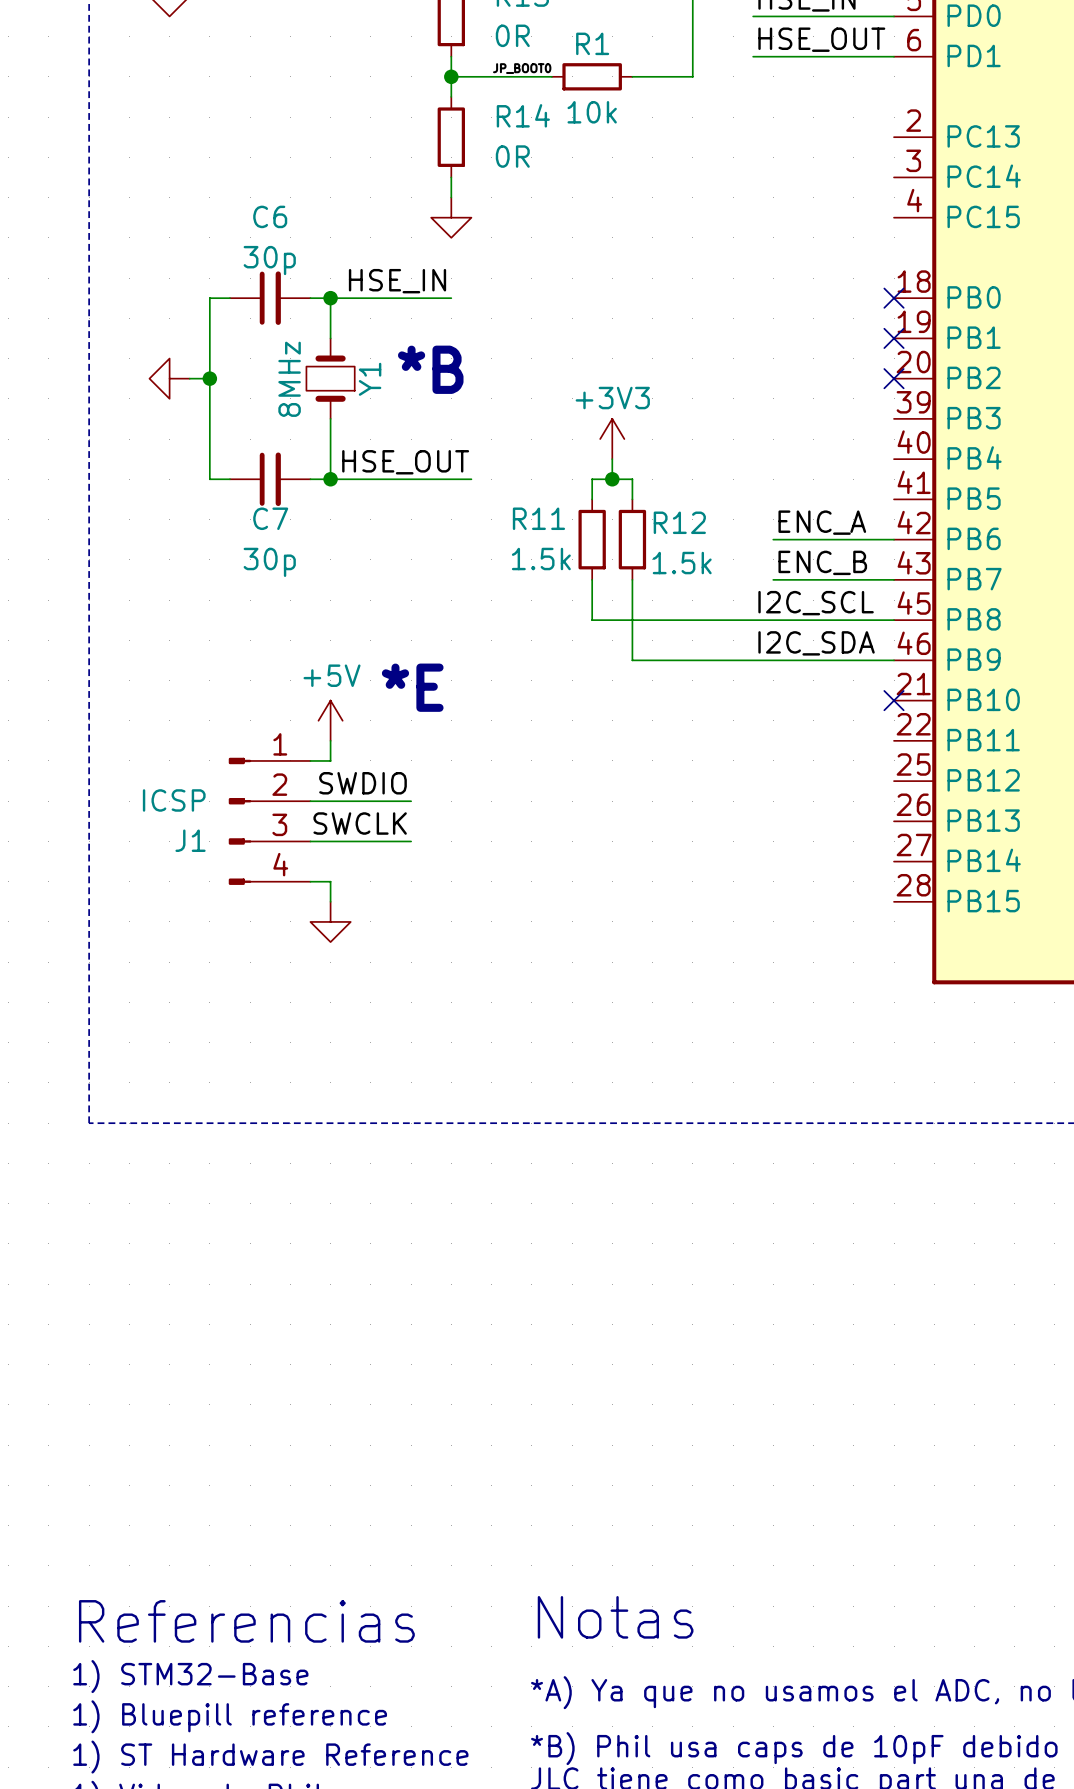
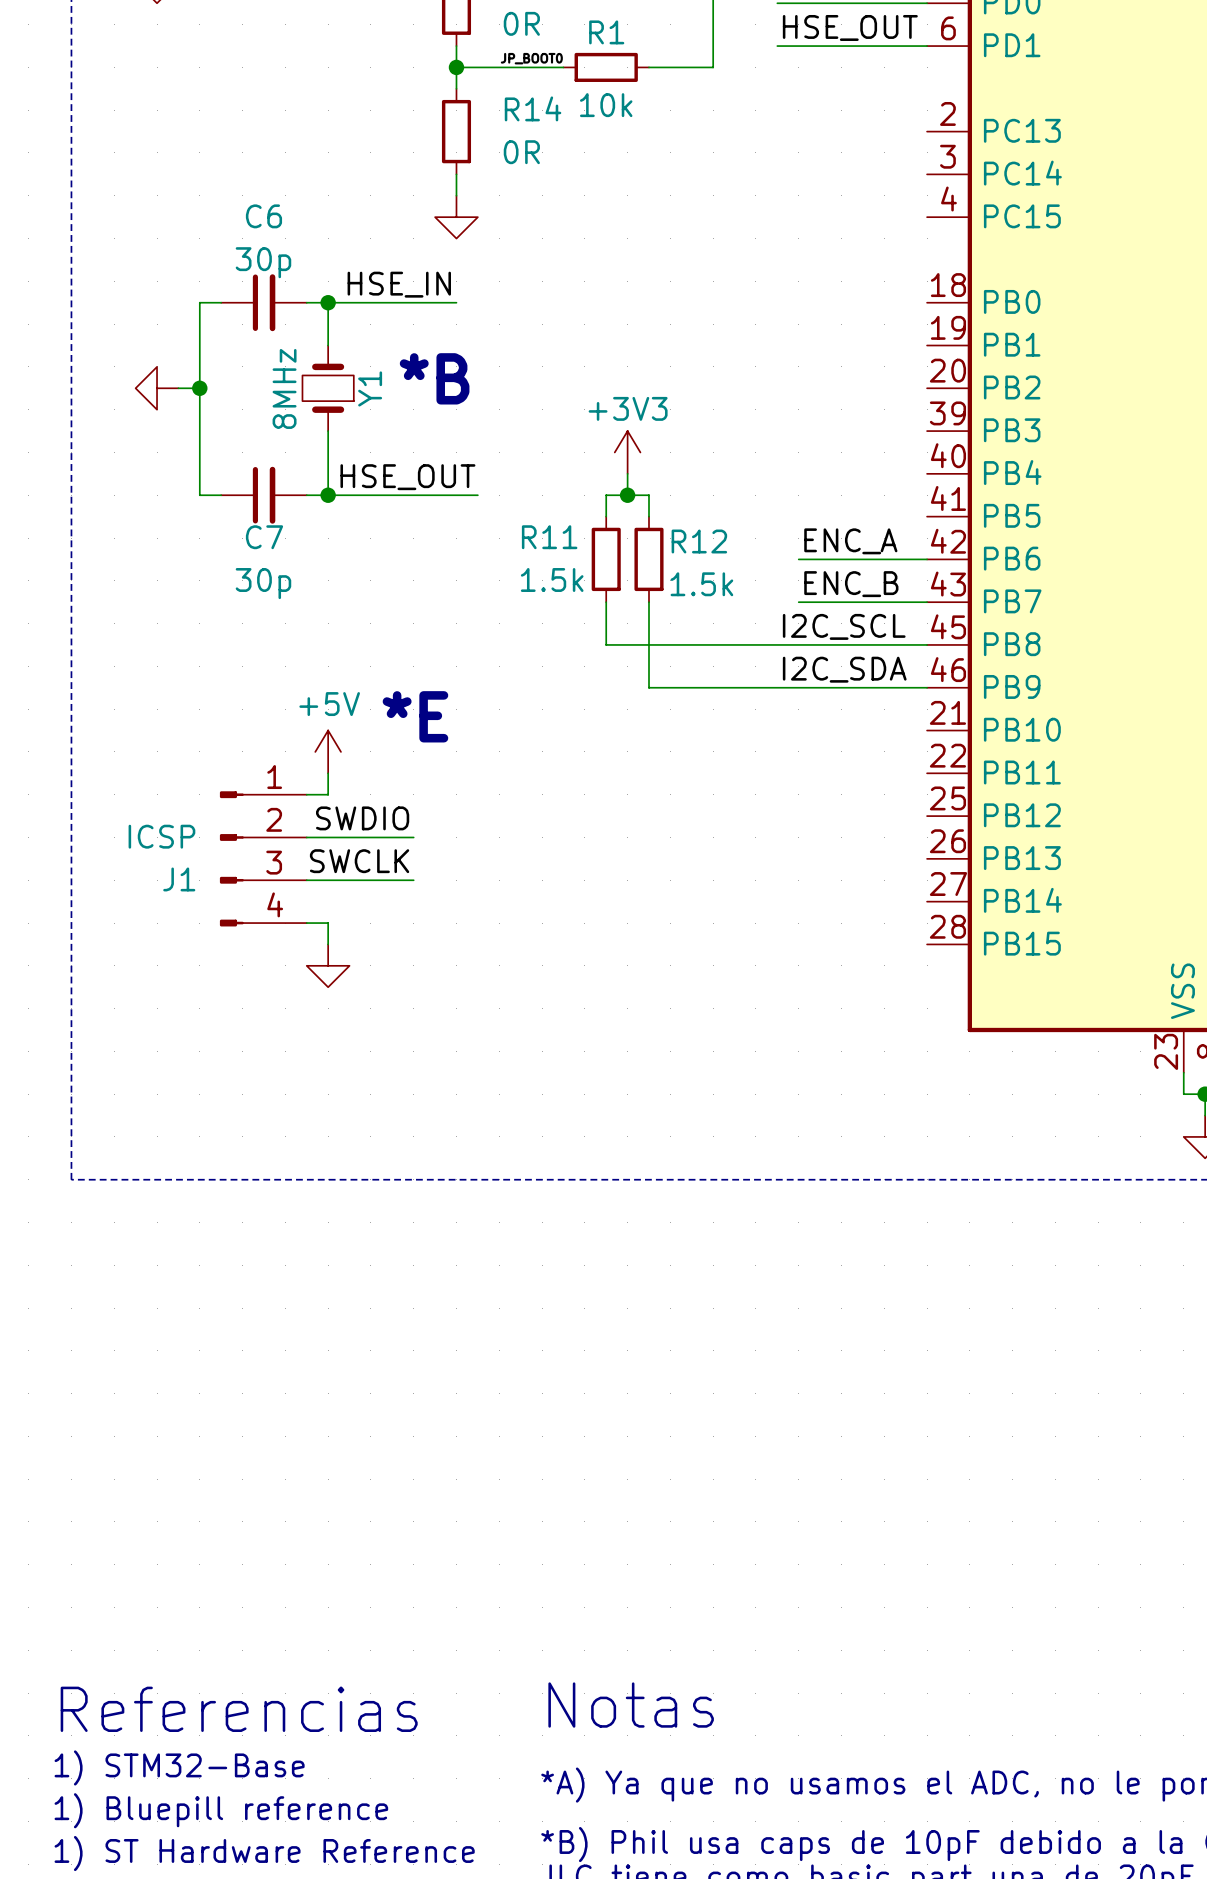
no-connect mark: (894, 298) -> none
no-connect mark: (894, 338) -> none
no-connect mark: (894, 378) -> none
no-connect mark: (894, 700) -> none

